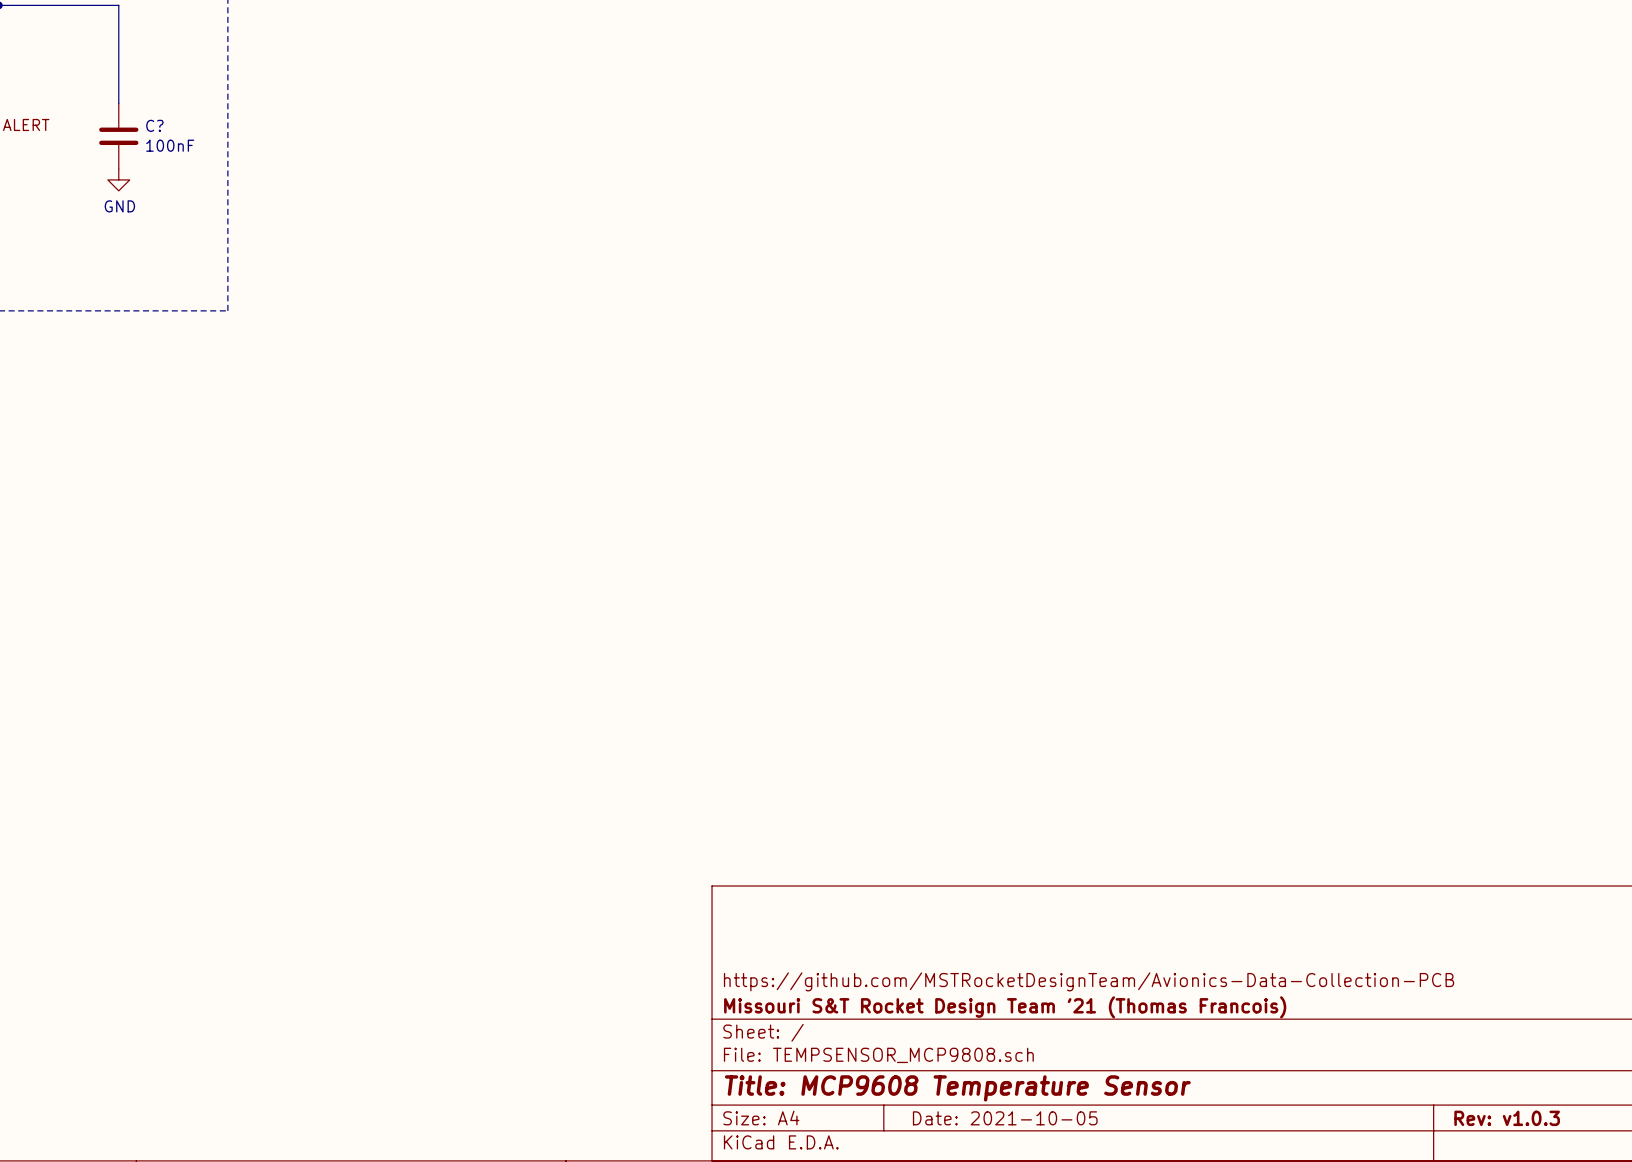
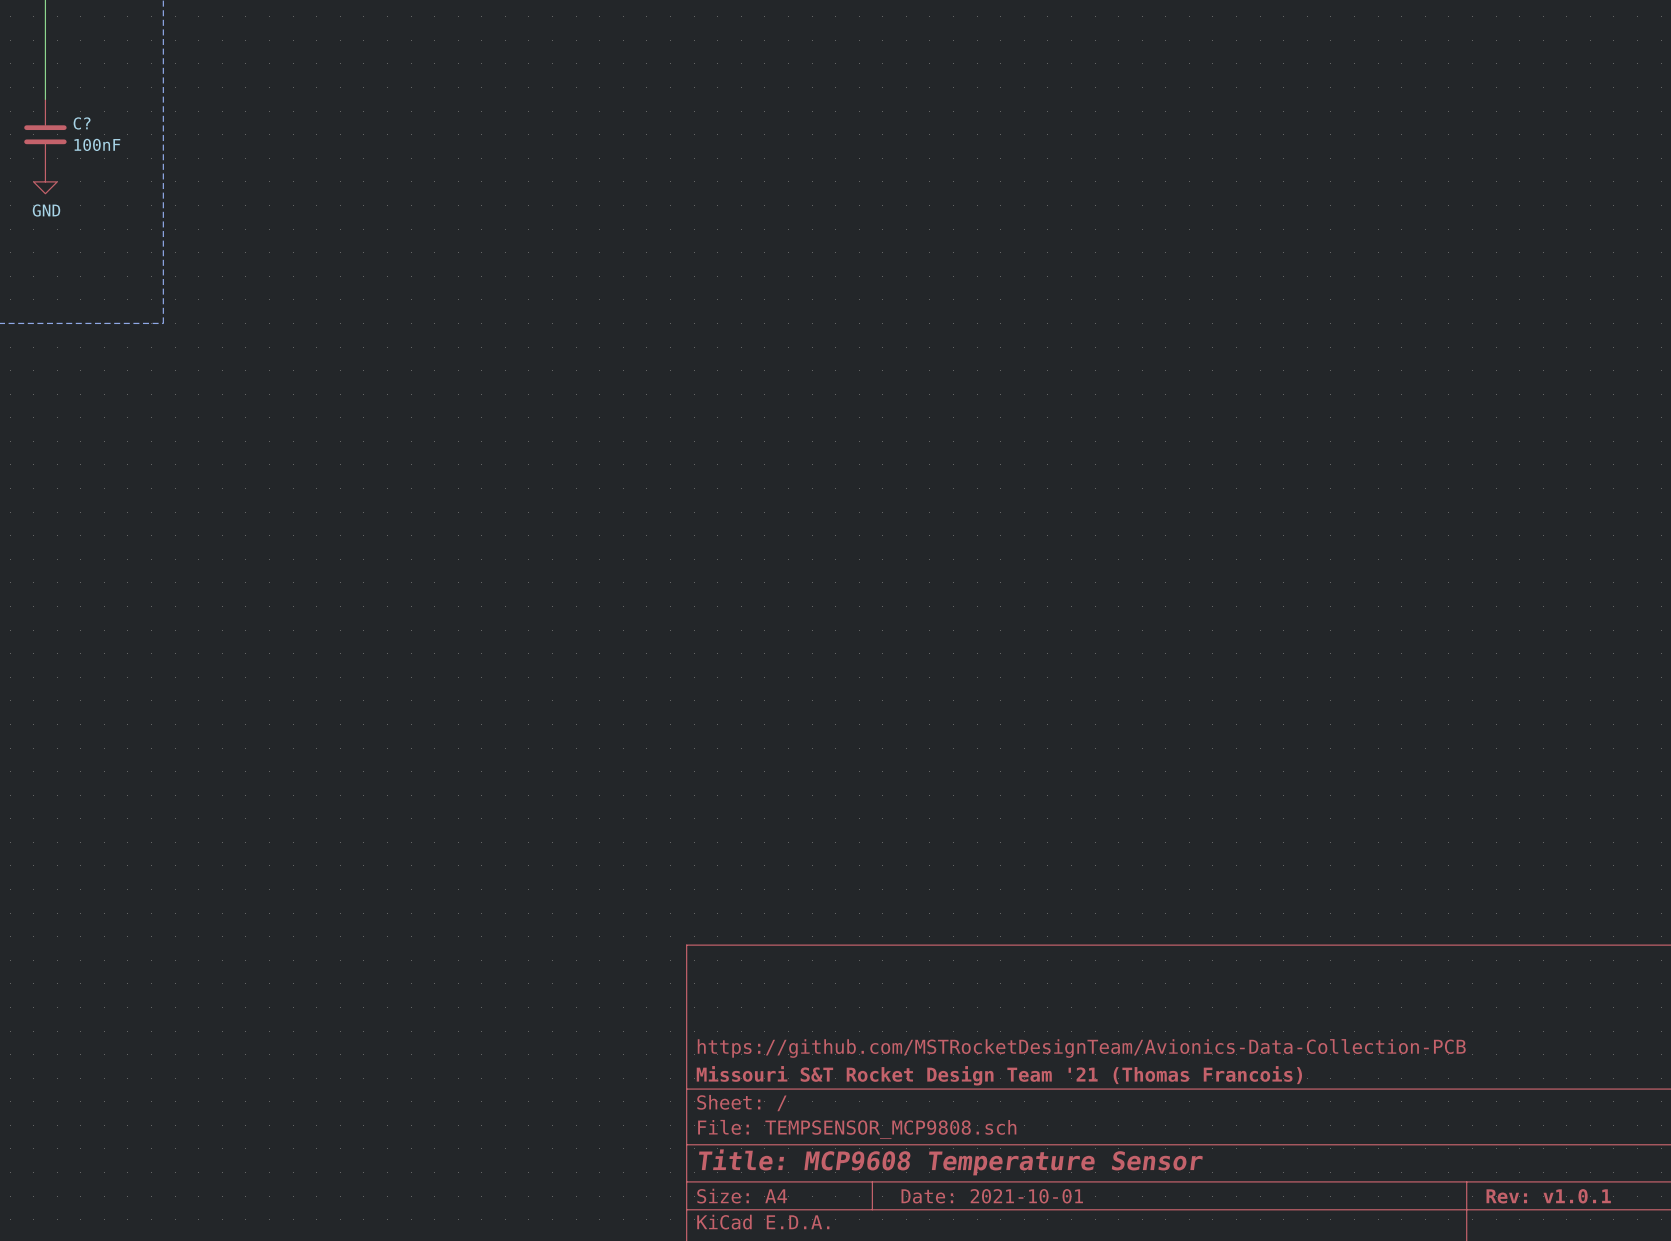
title block: Date: 2021-10-05 (1005, 1118) -> Date: 2021-10-01 (992, 1196)
title block: Rev: v1.0.3 (1507, 1118) -> Rev: v1.0.1 (1548, 1196)

